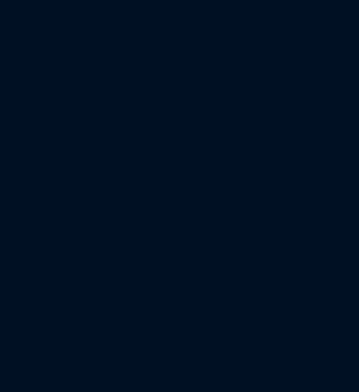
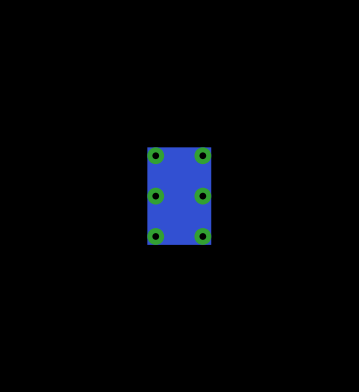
part: none -> (179, 196)

